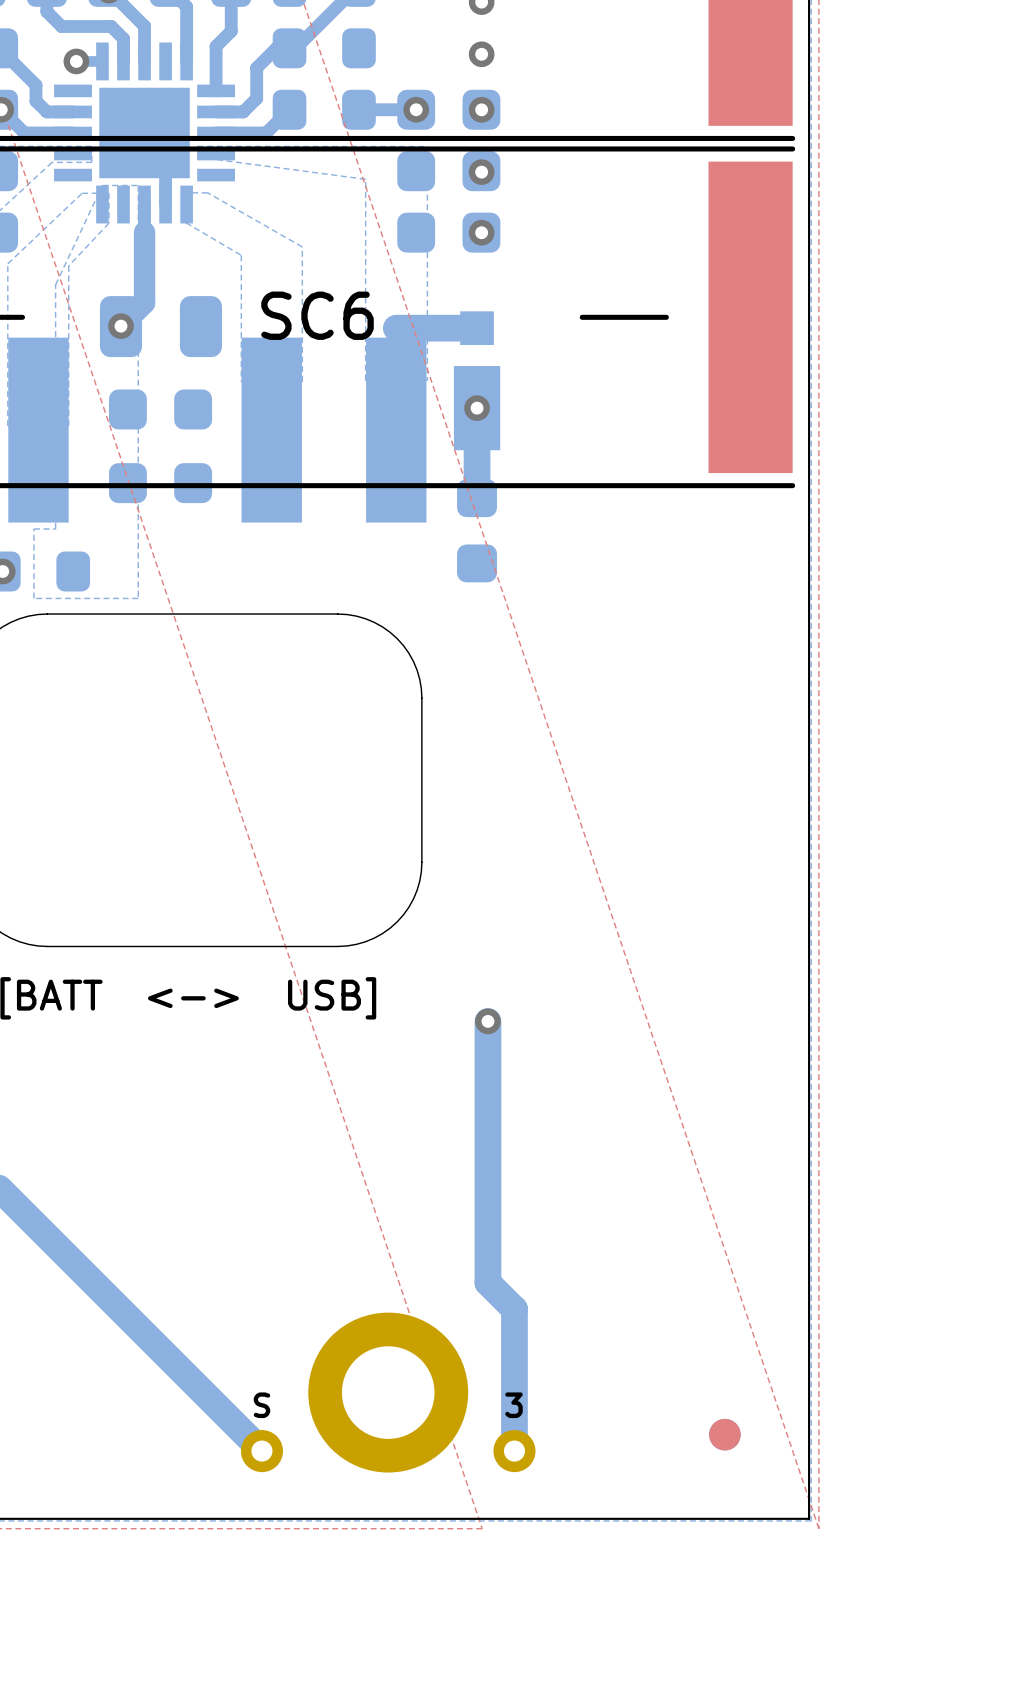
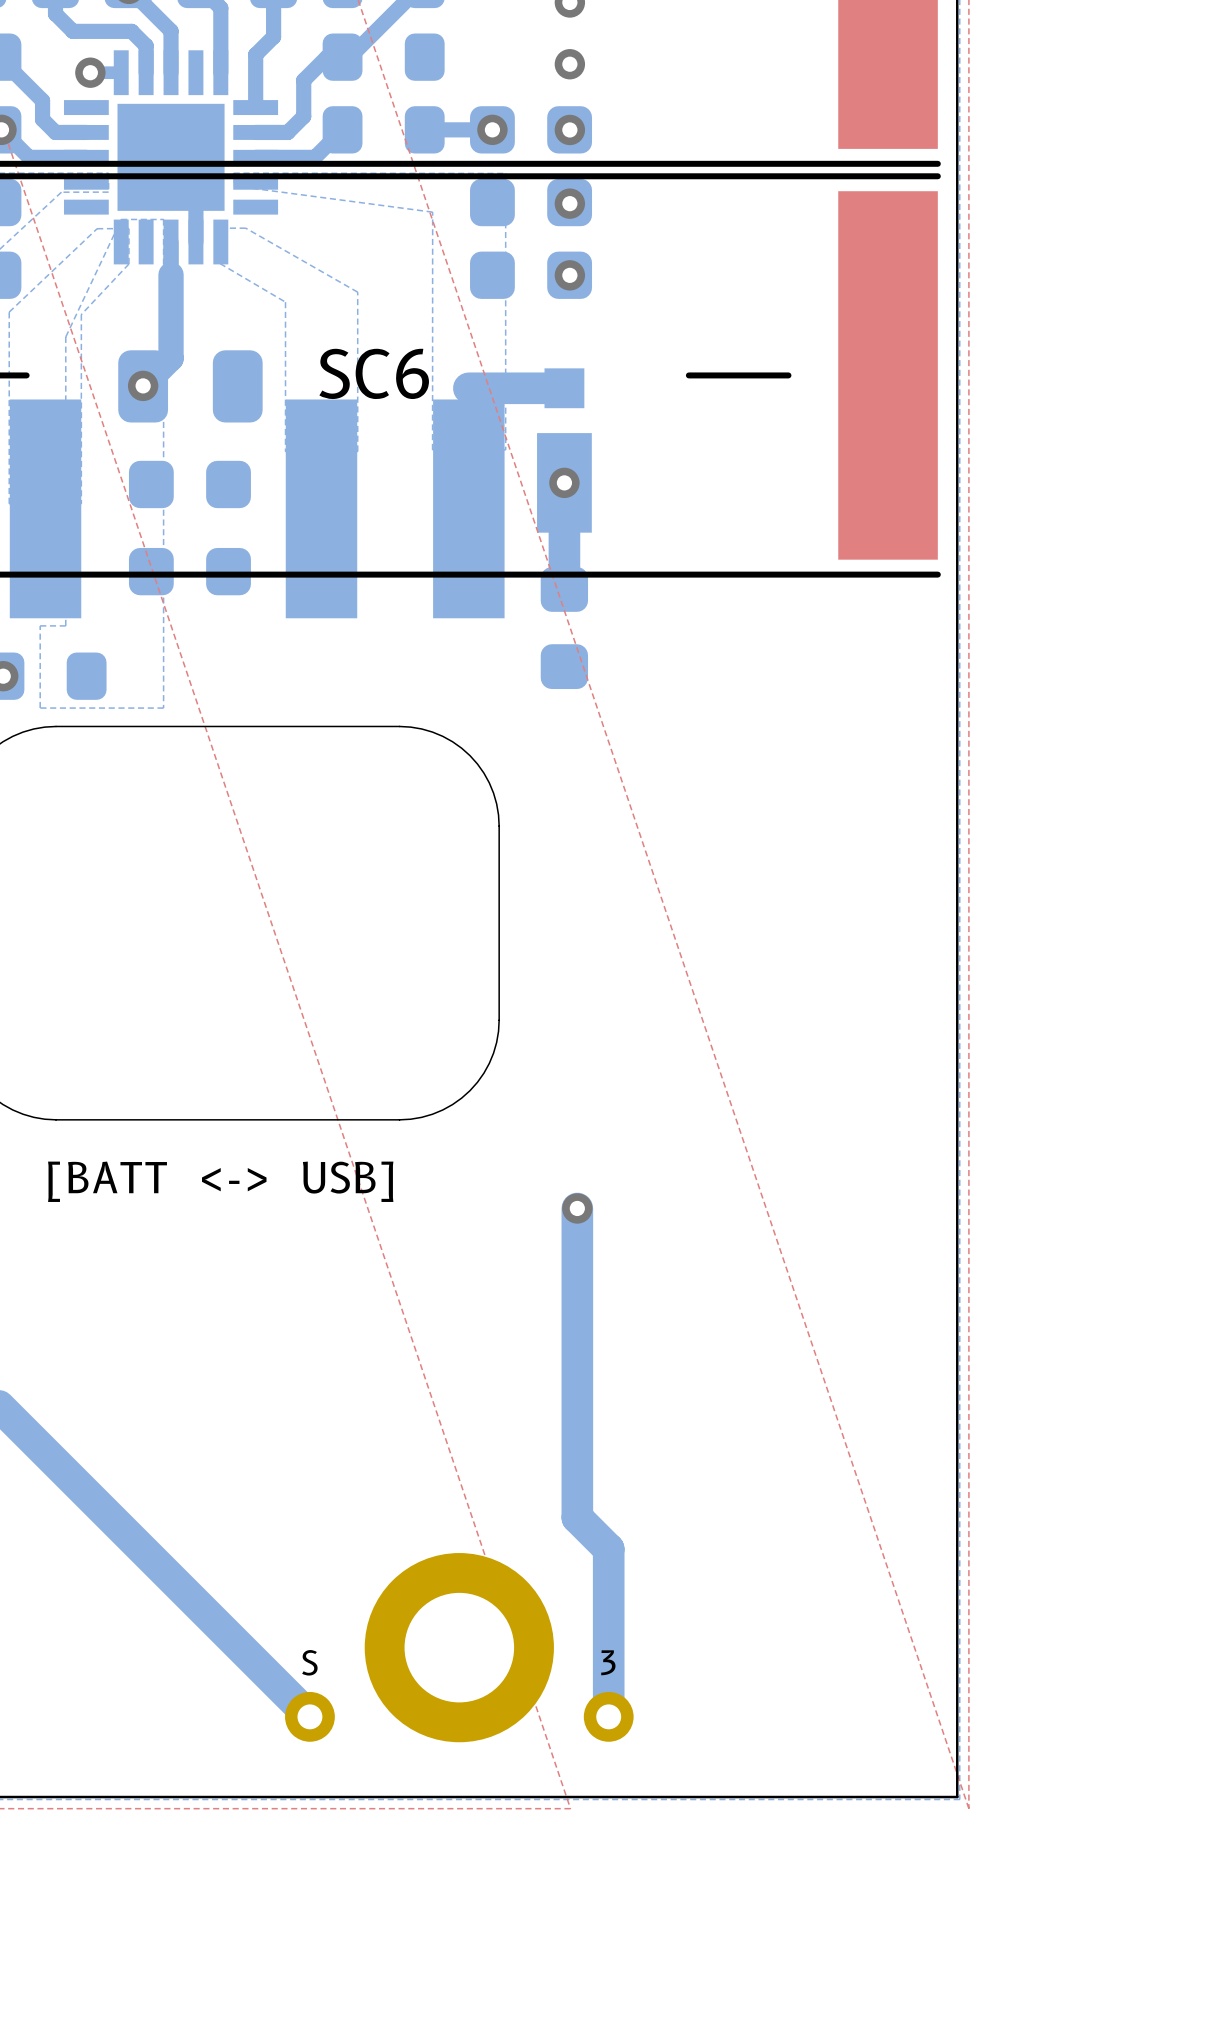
part: (724, 1434) -> none

